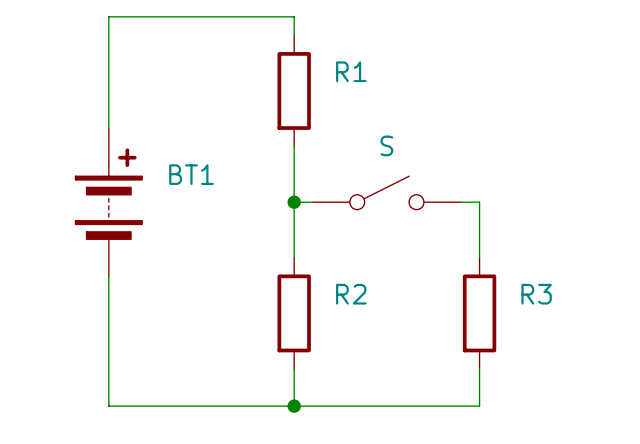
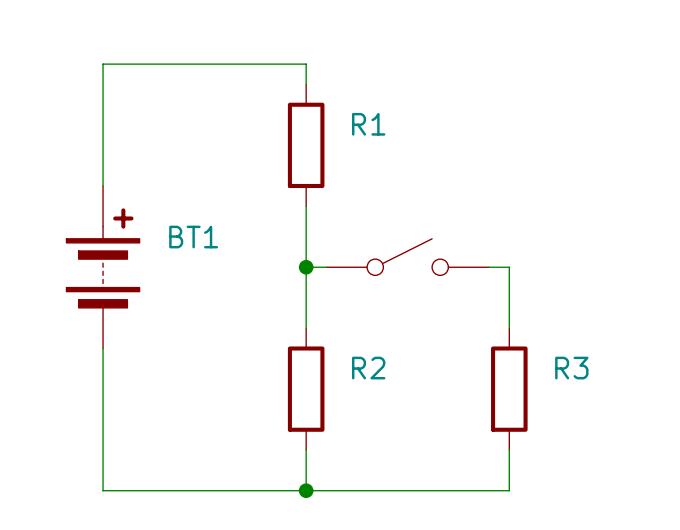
part value: S (386, 145) -> none

